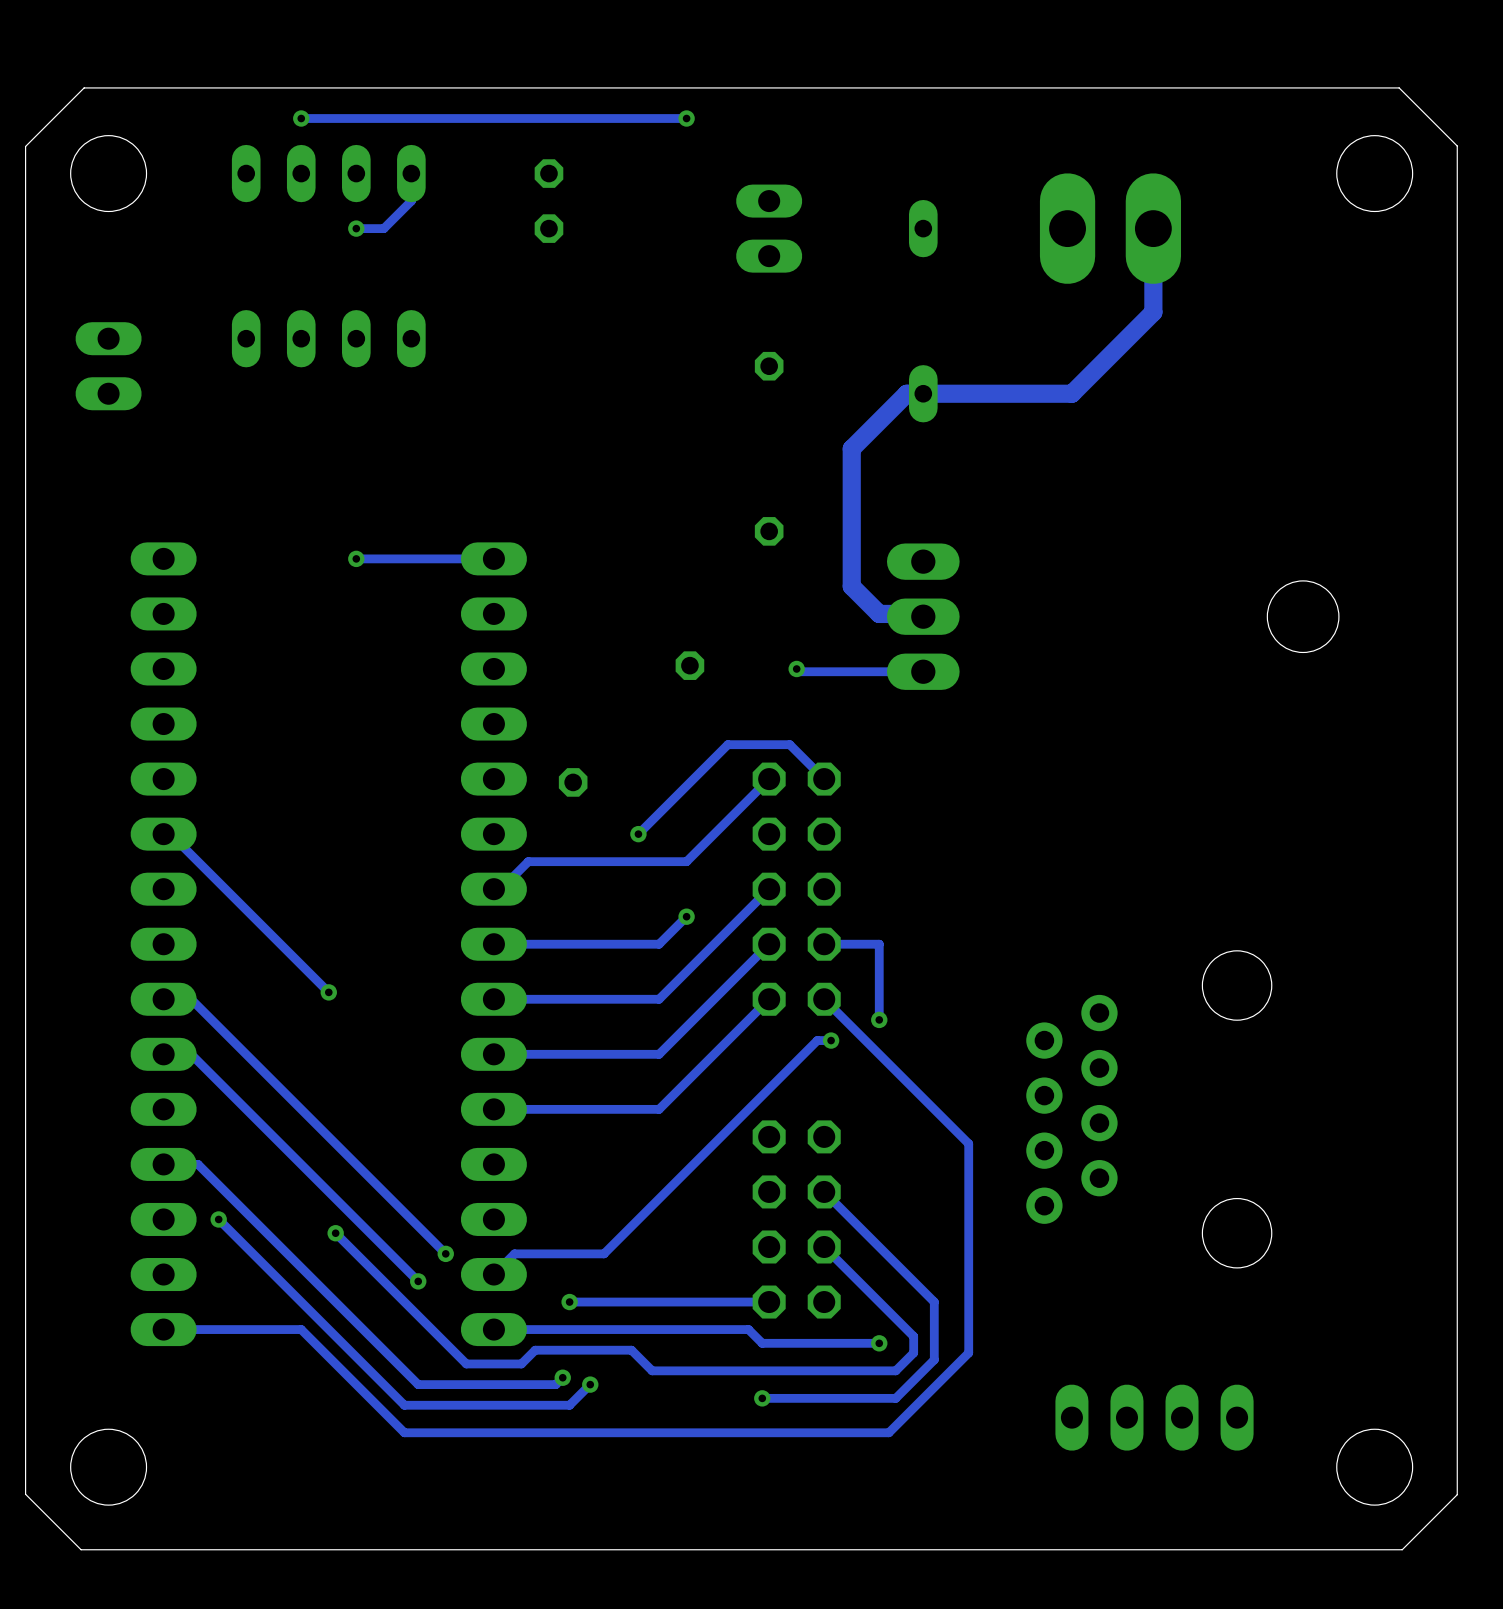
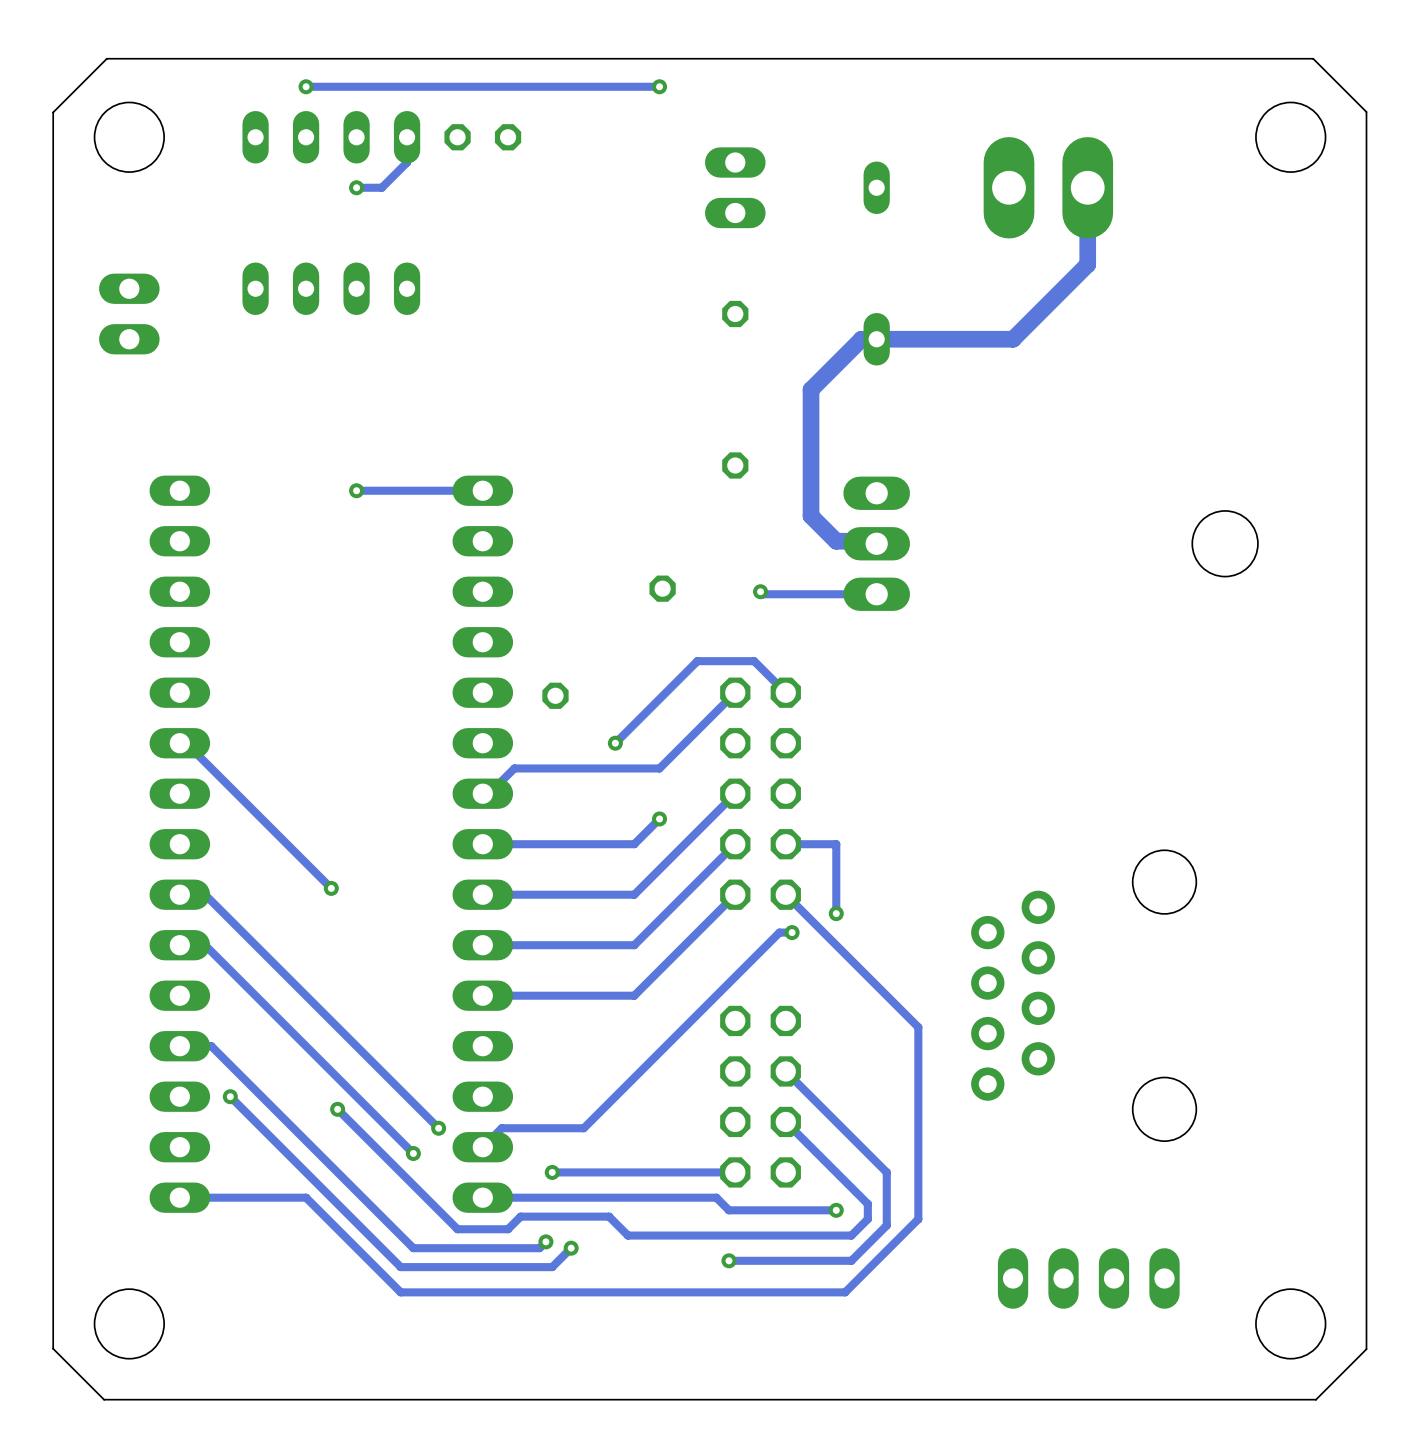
part rotation: 0° (548, 201) -> 90° clockwise (482, 137)
part position: (548, 201) -> (482, 137)

